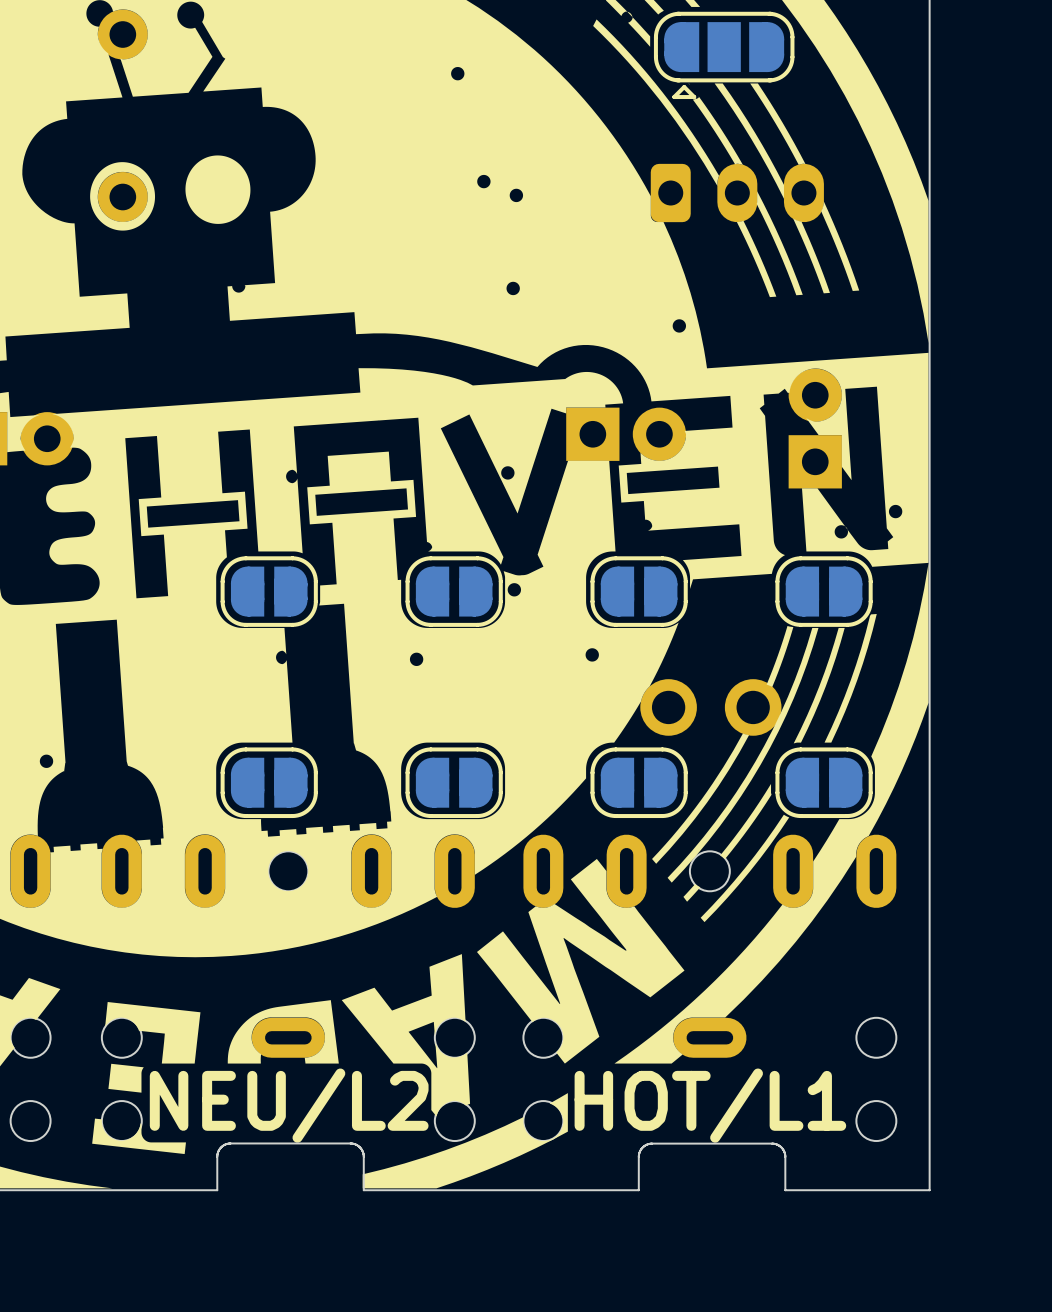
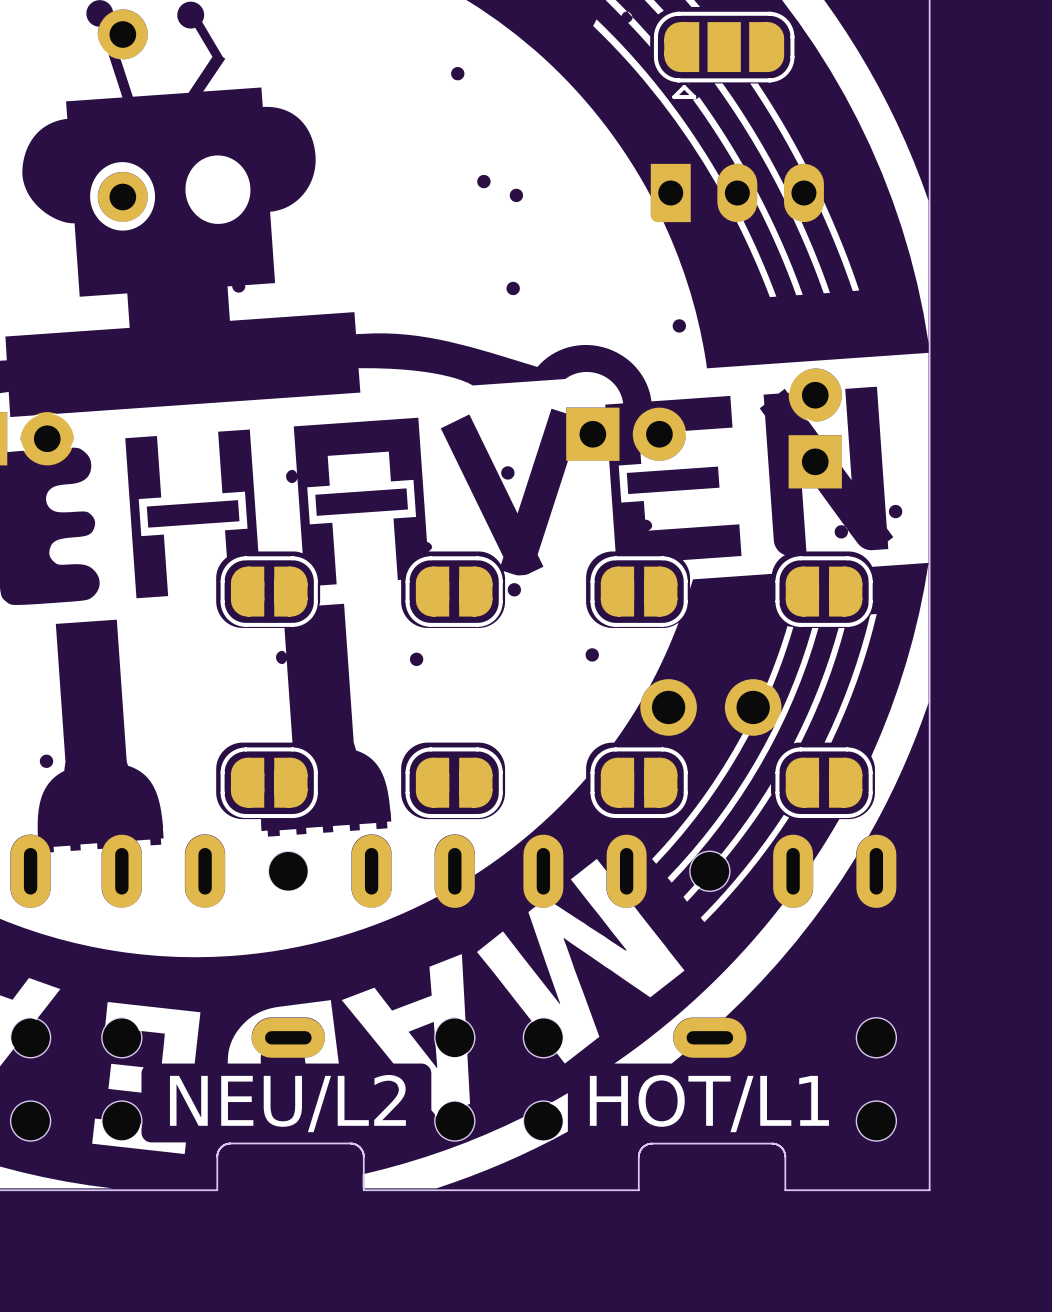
part footprint: [650, 163, 824, 223] -> [650, 163, 824, 223]

